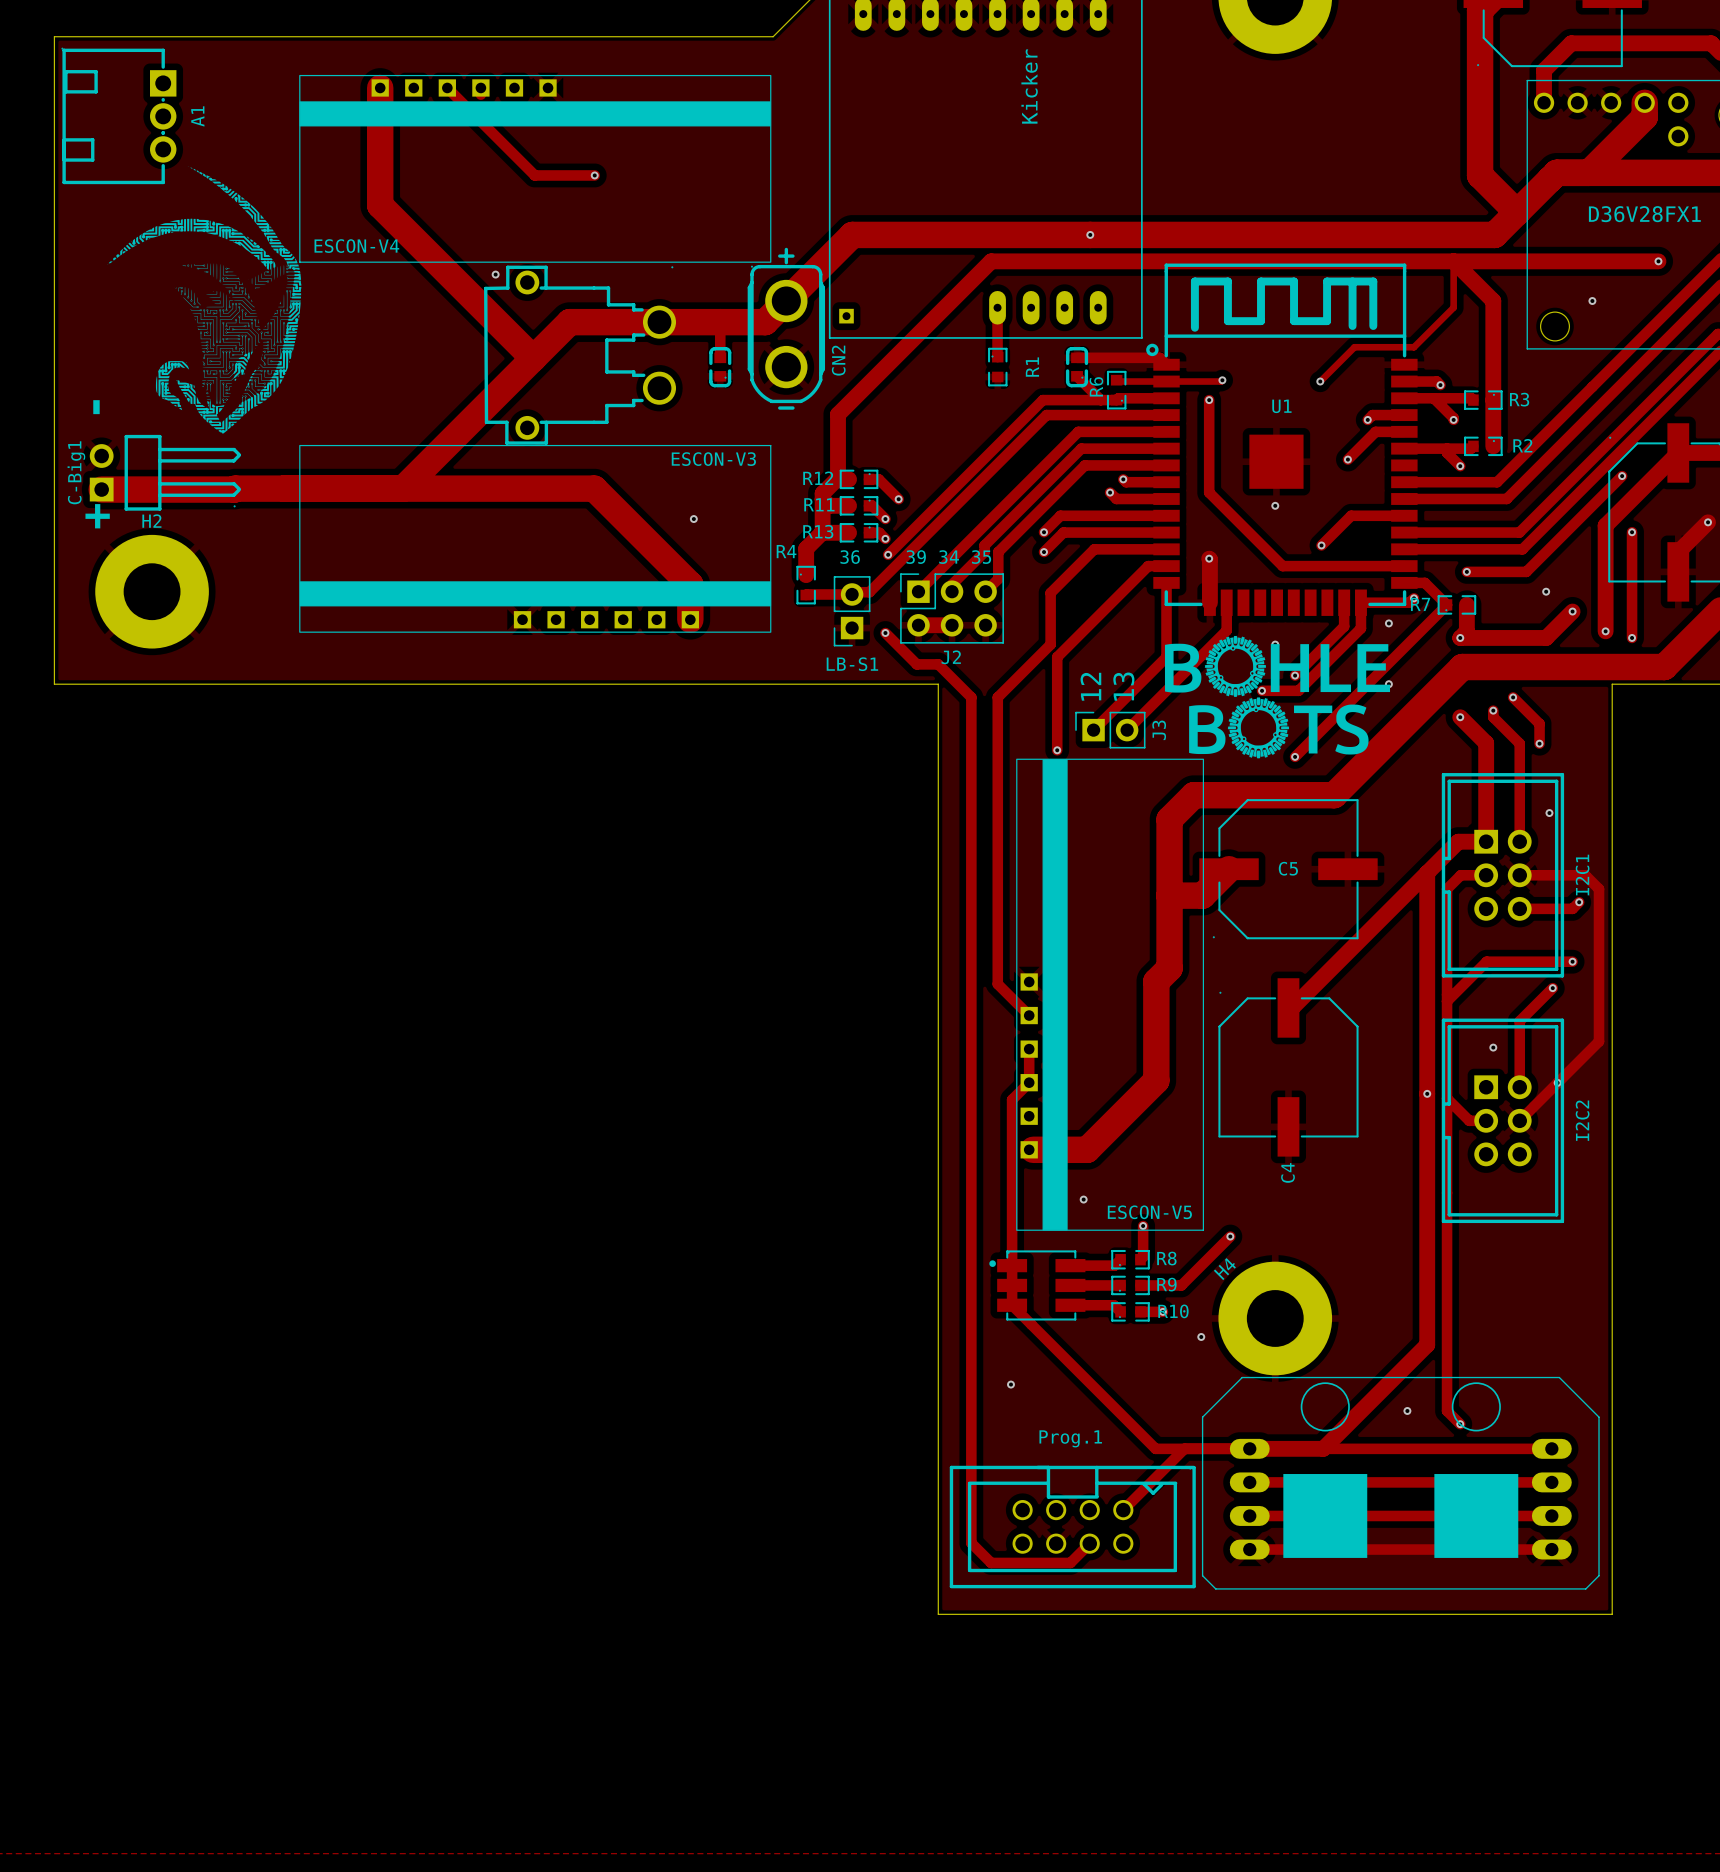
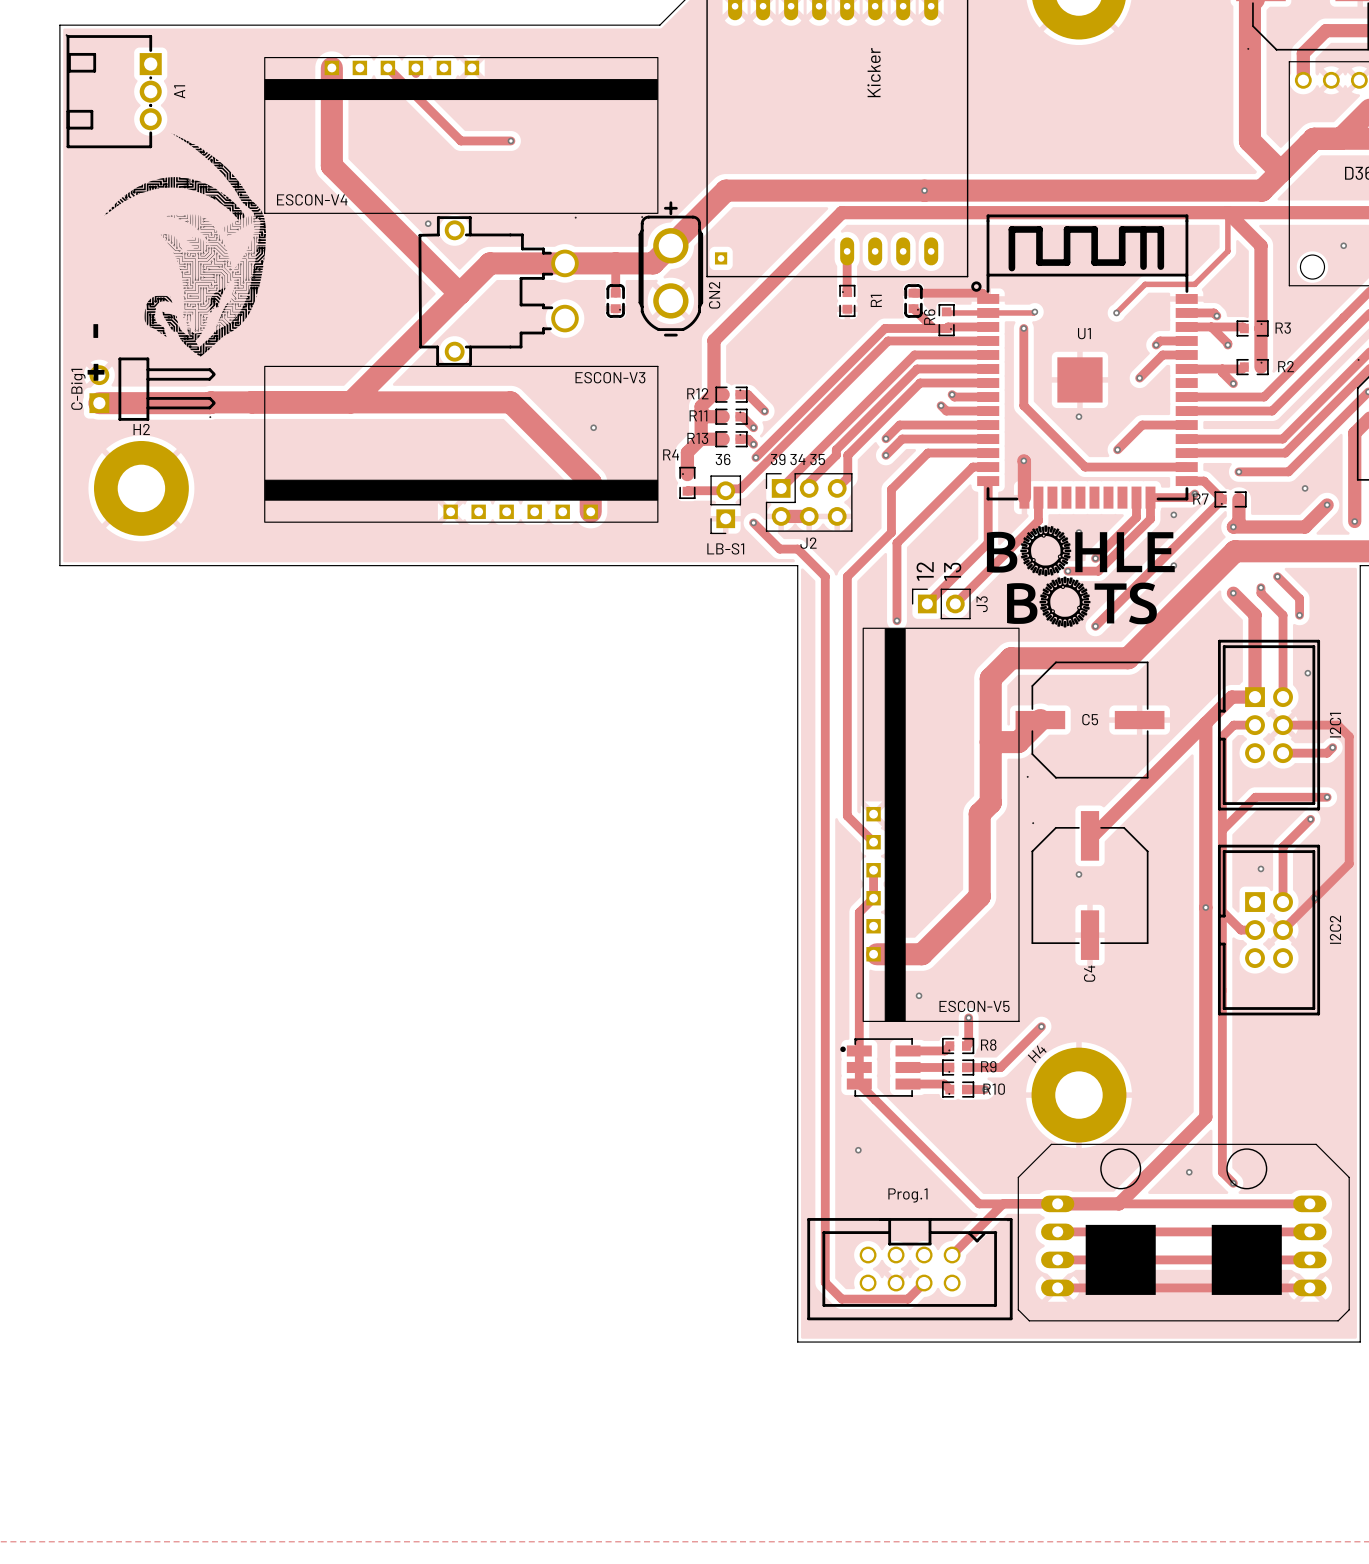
via: none -> (1078, 874)
via: (1201, 1336) -> none

